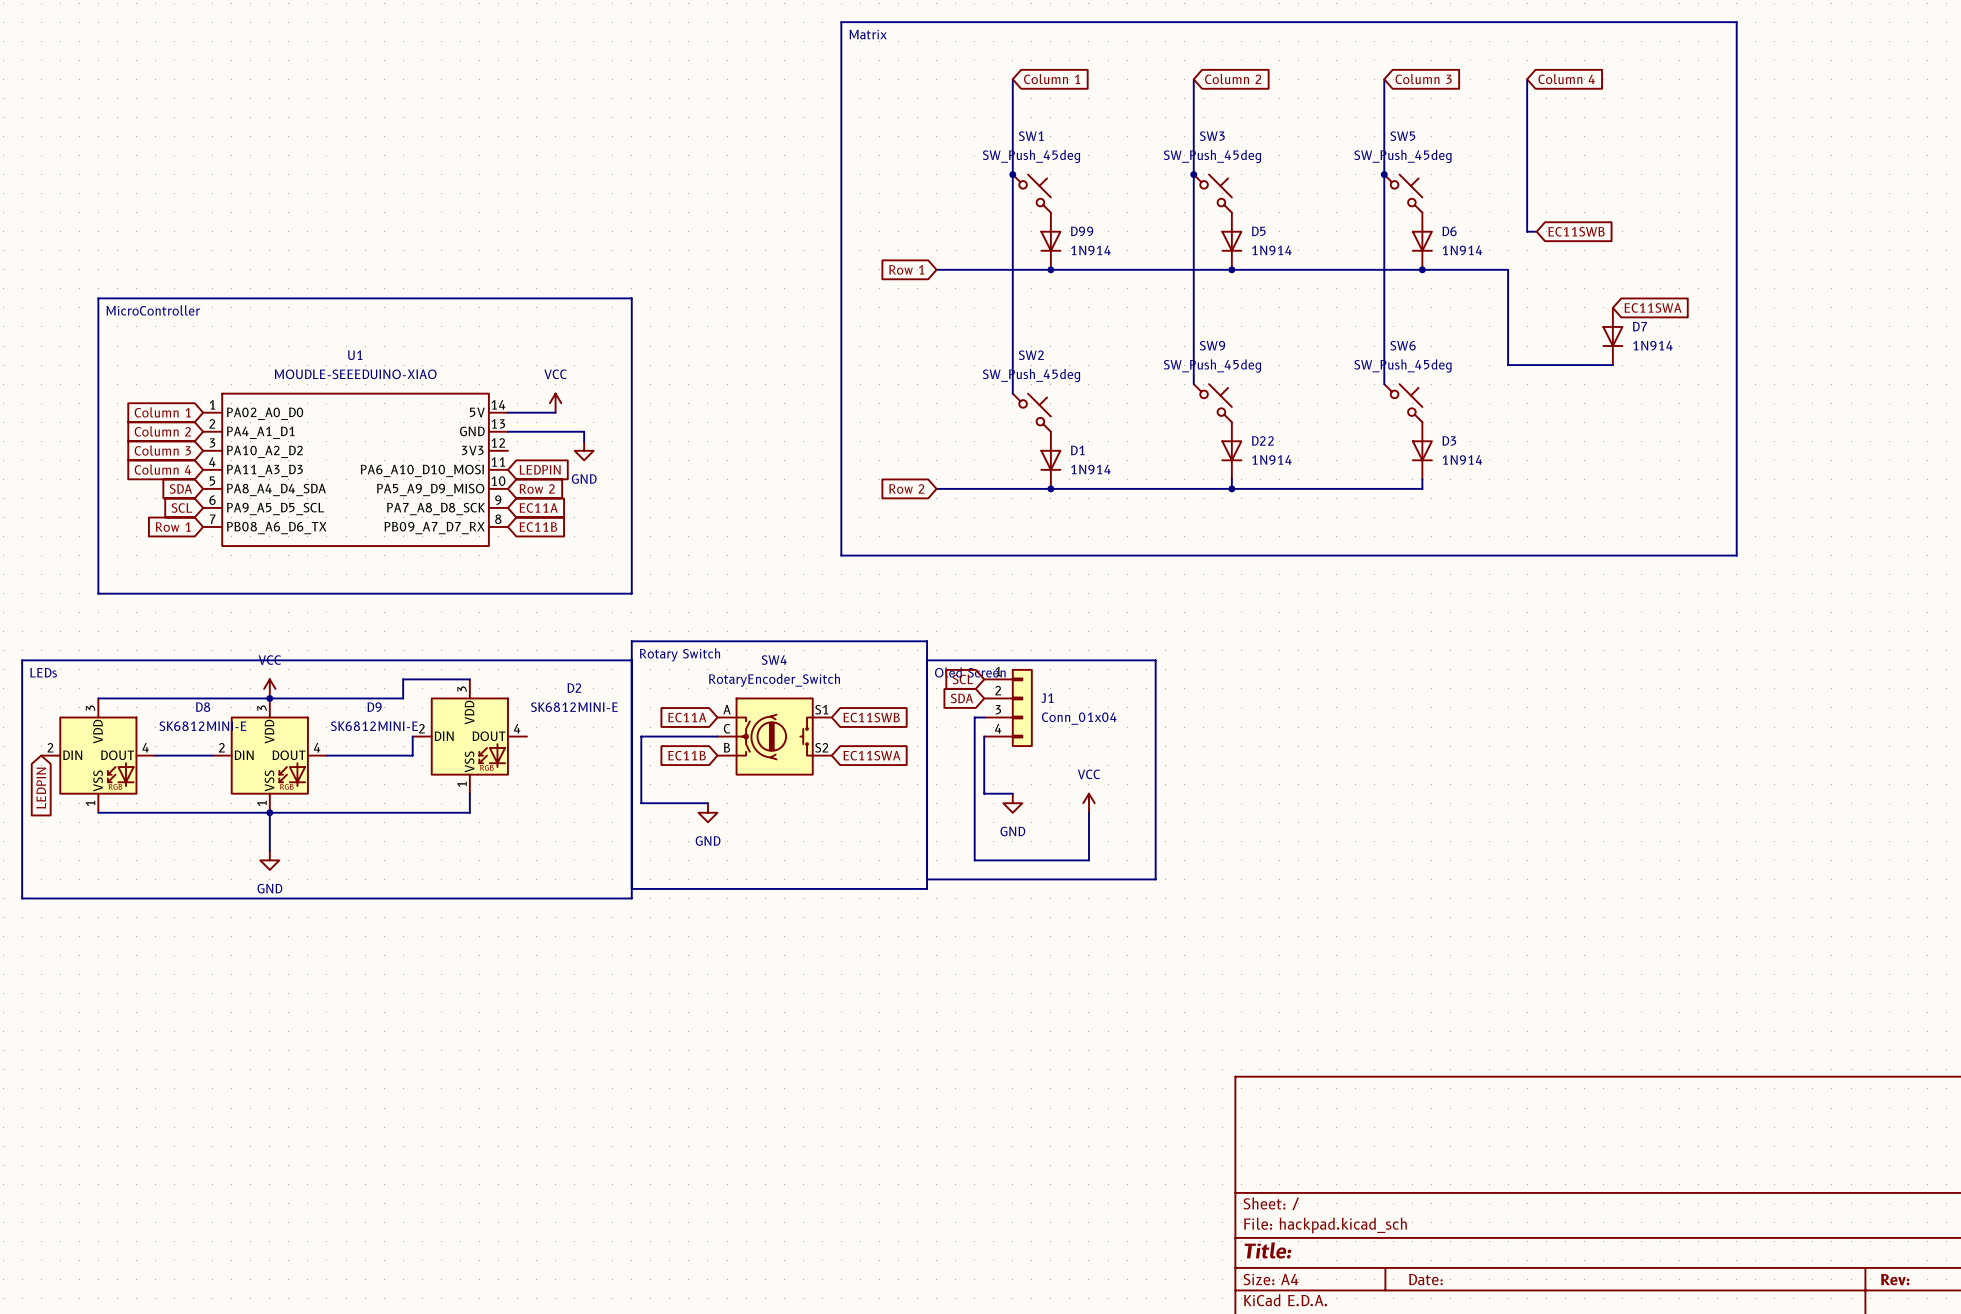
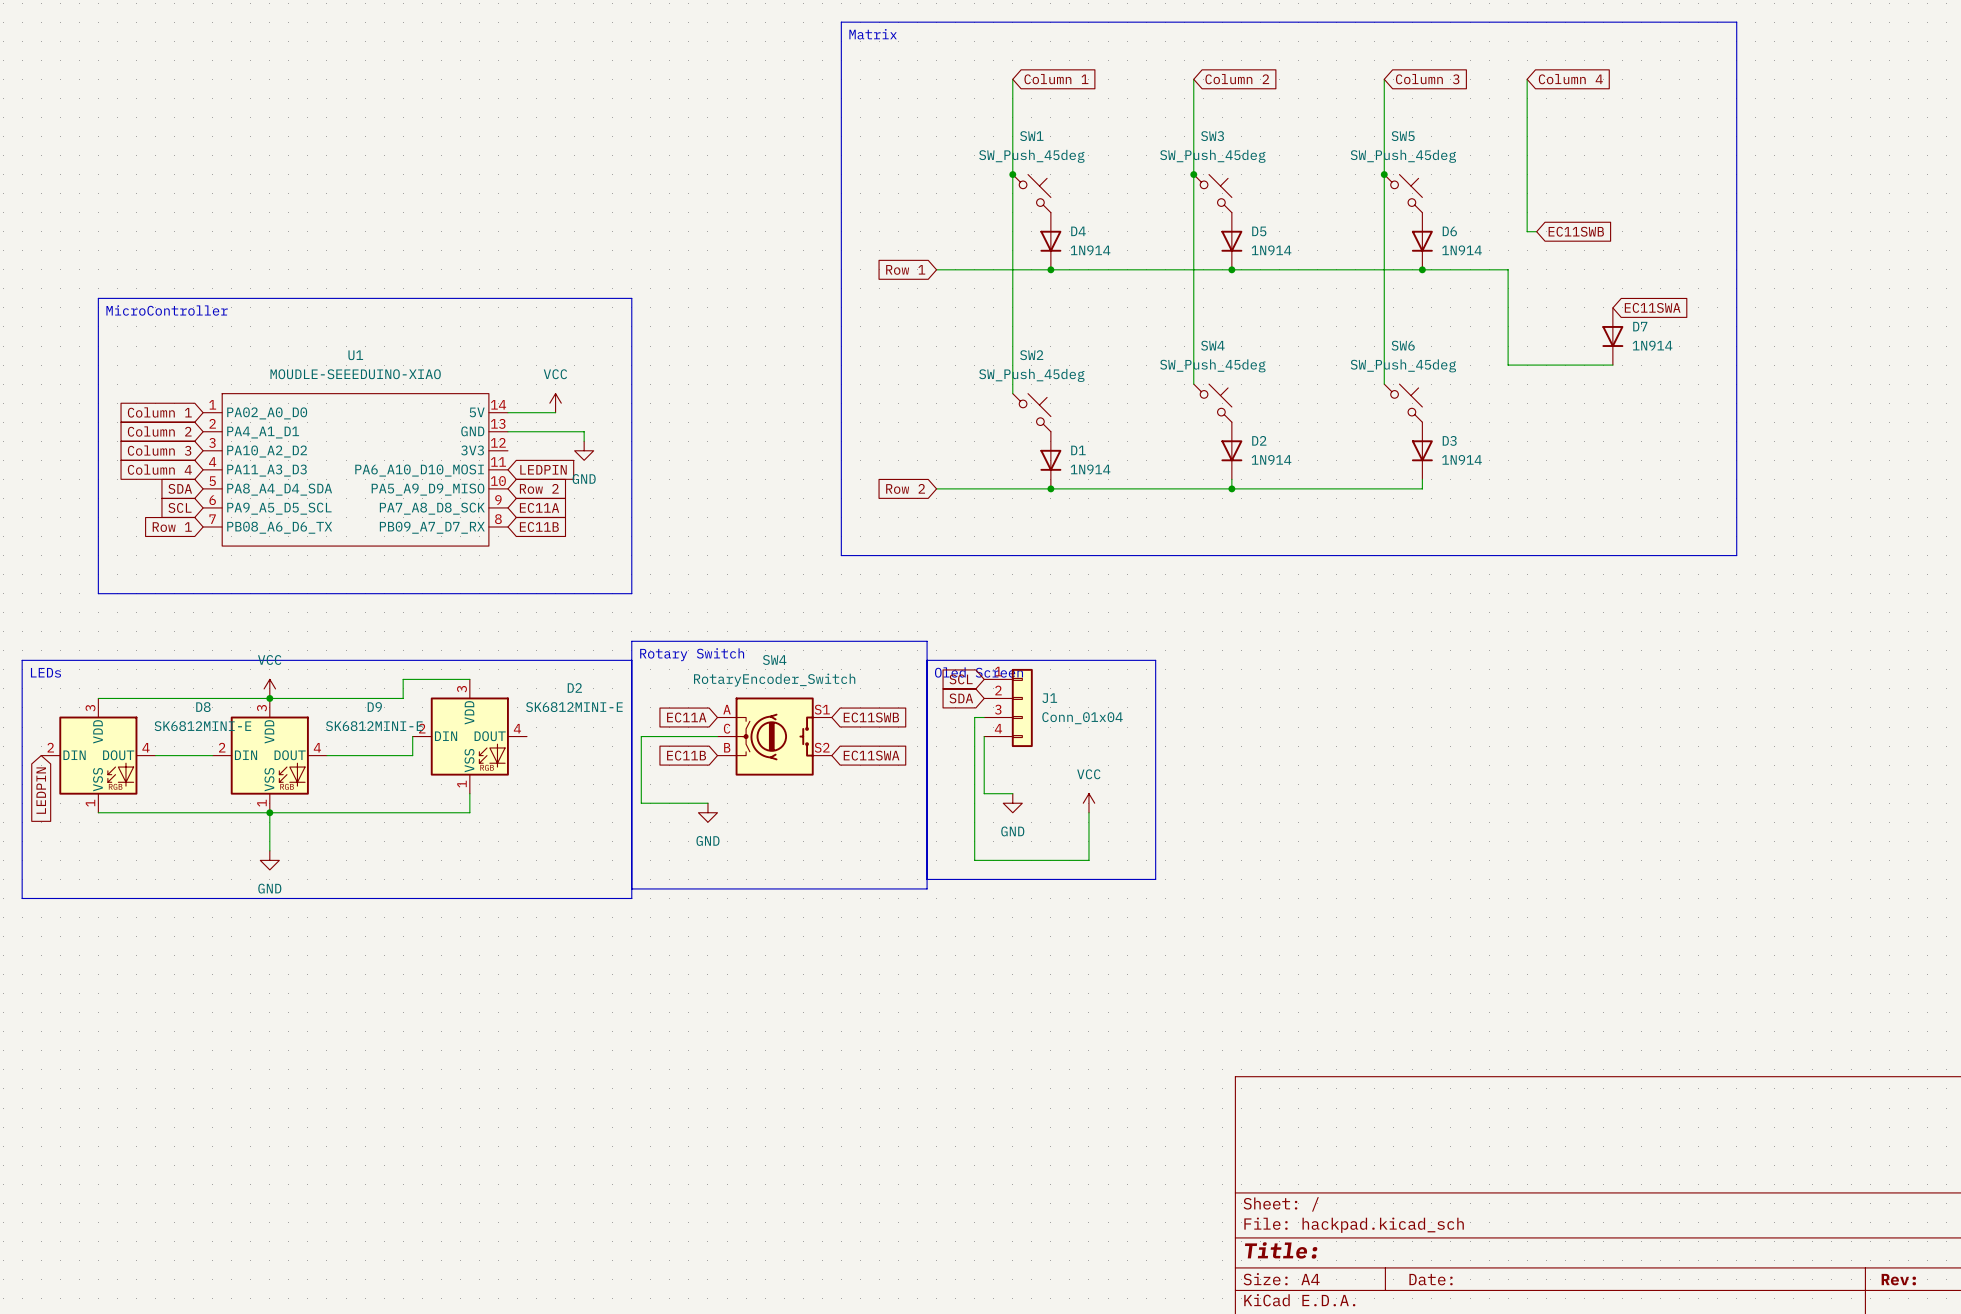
D99 name: D99 (1082, 231) -> D4 (1078, 231)
SW9 name: SW9 (1212, 345) -> SW4 (1212, 345)
D22 name: D22 (1262, 440) -> D2 (1259, 440)

